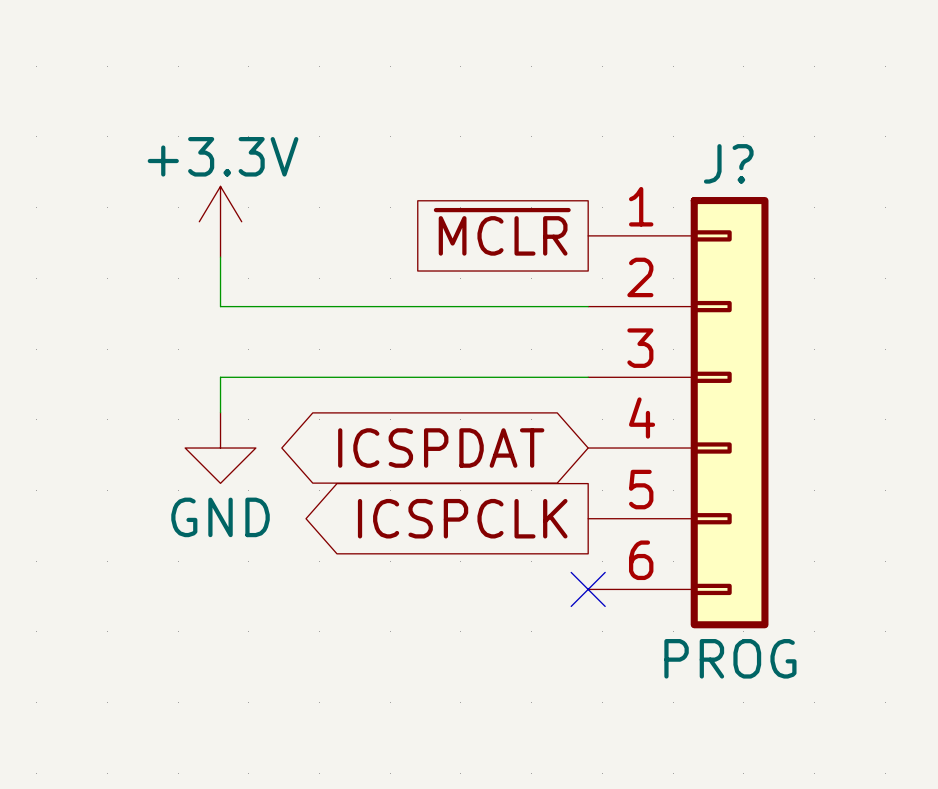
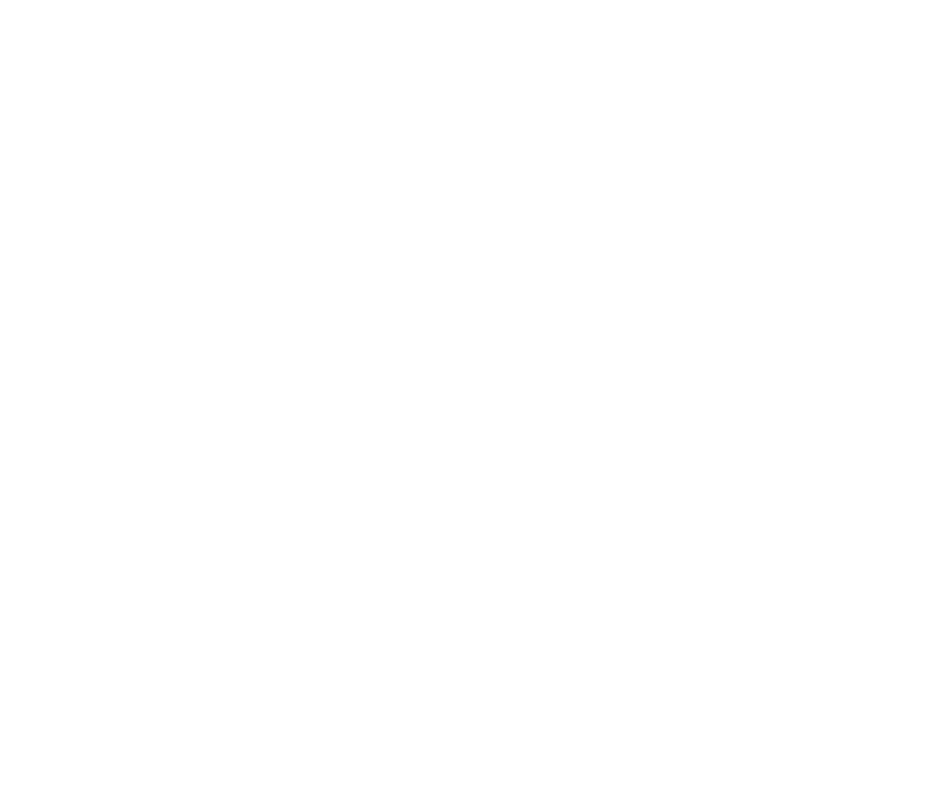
power symbol: +3.3V (220, 221) -> none
global label: ~{MCLR} (502, 231) -> none
wire: (220, 257) (220, 306) (588, 306) -> none
wire: (588, 377) (220, 377) (220, 412) -> none
J?: PROG (678, 412) -> none
power symbol: GND (220, 448) -> none
global label: ICSPDAT (441, 448) -> none
global label: ICSPCLK (462, 518) -> none
no-connect mark: (588, 589) -> none

